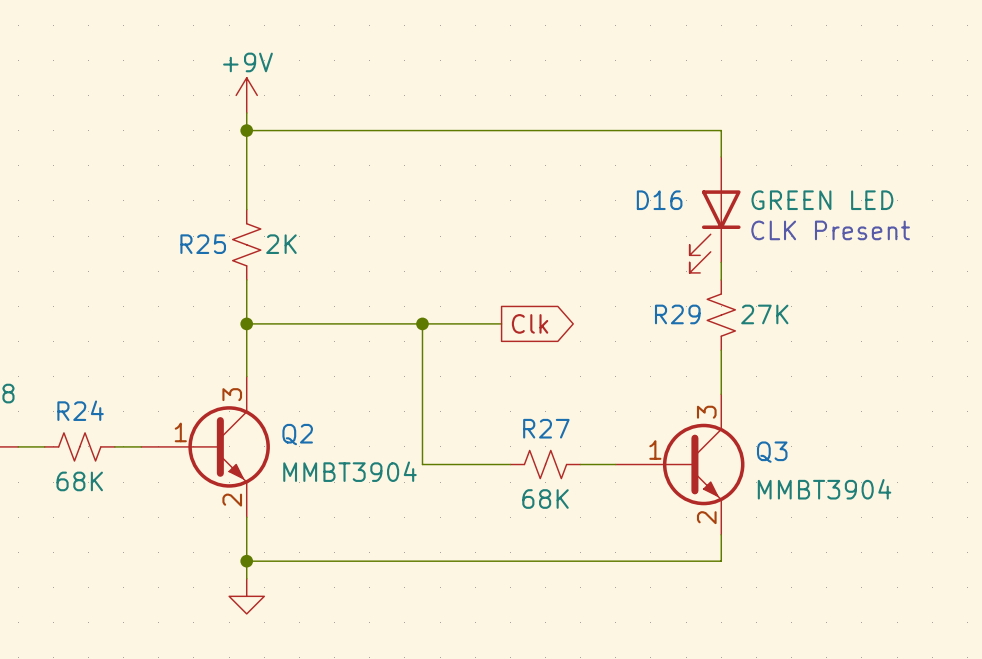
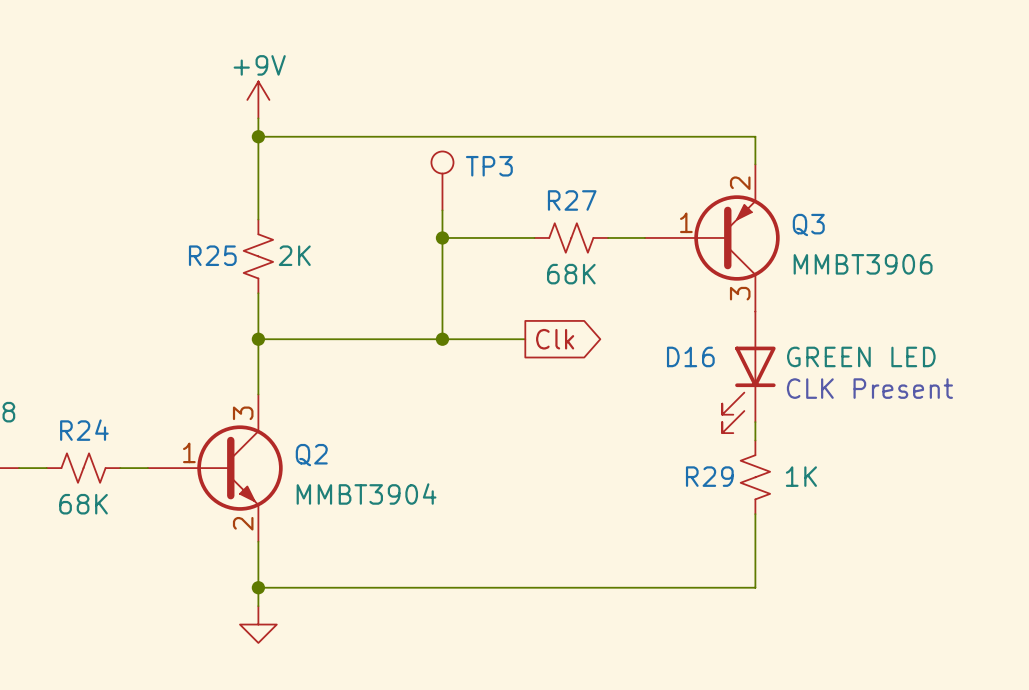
TP3: none -> (442, 180)
D16 position: (715, 214) -> (748, 372)
wire: none -> (442, 237) (534, 237)
junction: none -> (442, 237)
text position: CLK Present (830, 230) -> CLK Present (869, 388)
R29 value: 27K (764, 314) -> 1K (801, 476)
R29 position: (721, 315) -> (755, 477)
wire: (422, 323) (422, 464) (510, 464) -> (442, 339) (442, 210)
Q3 symbol: [615, 394, 745, 535] -> [644, 164, 780, 312]
R27 position: (545, 464) -> (571, 237)
wire: (580, 464) (615, 464) -> (608, 237) (644, 237)
Q3 value: MMBT3904 (824, 489) -> MMBT3906 (863, 264)

